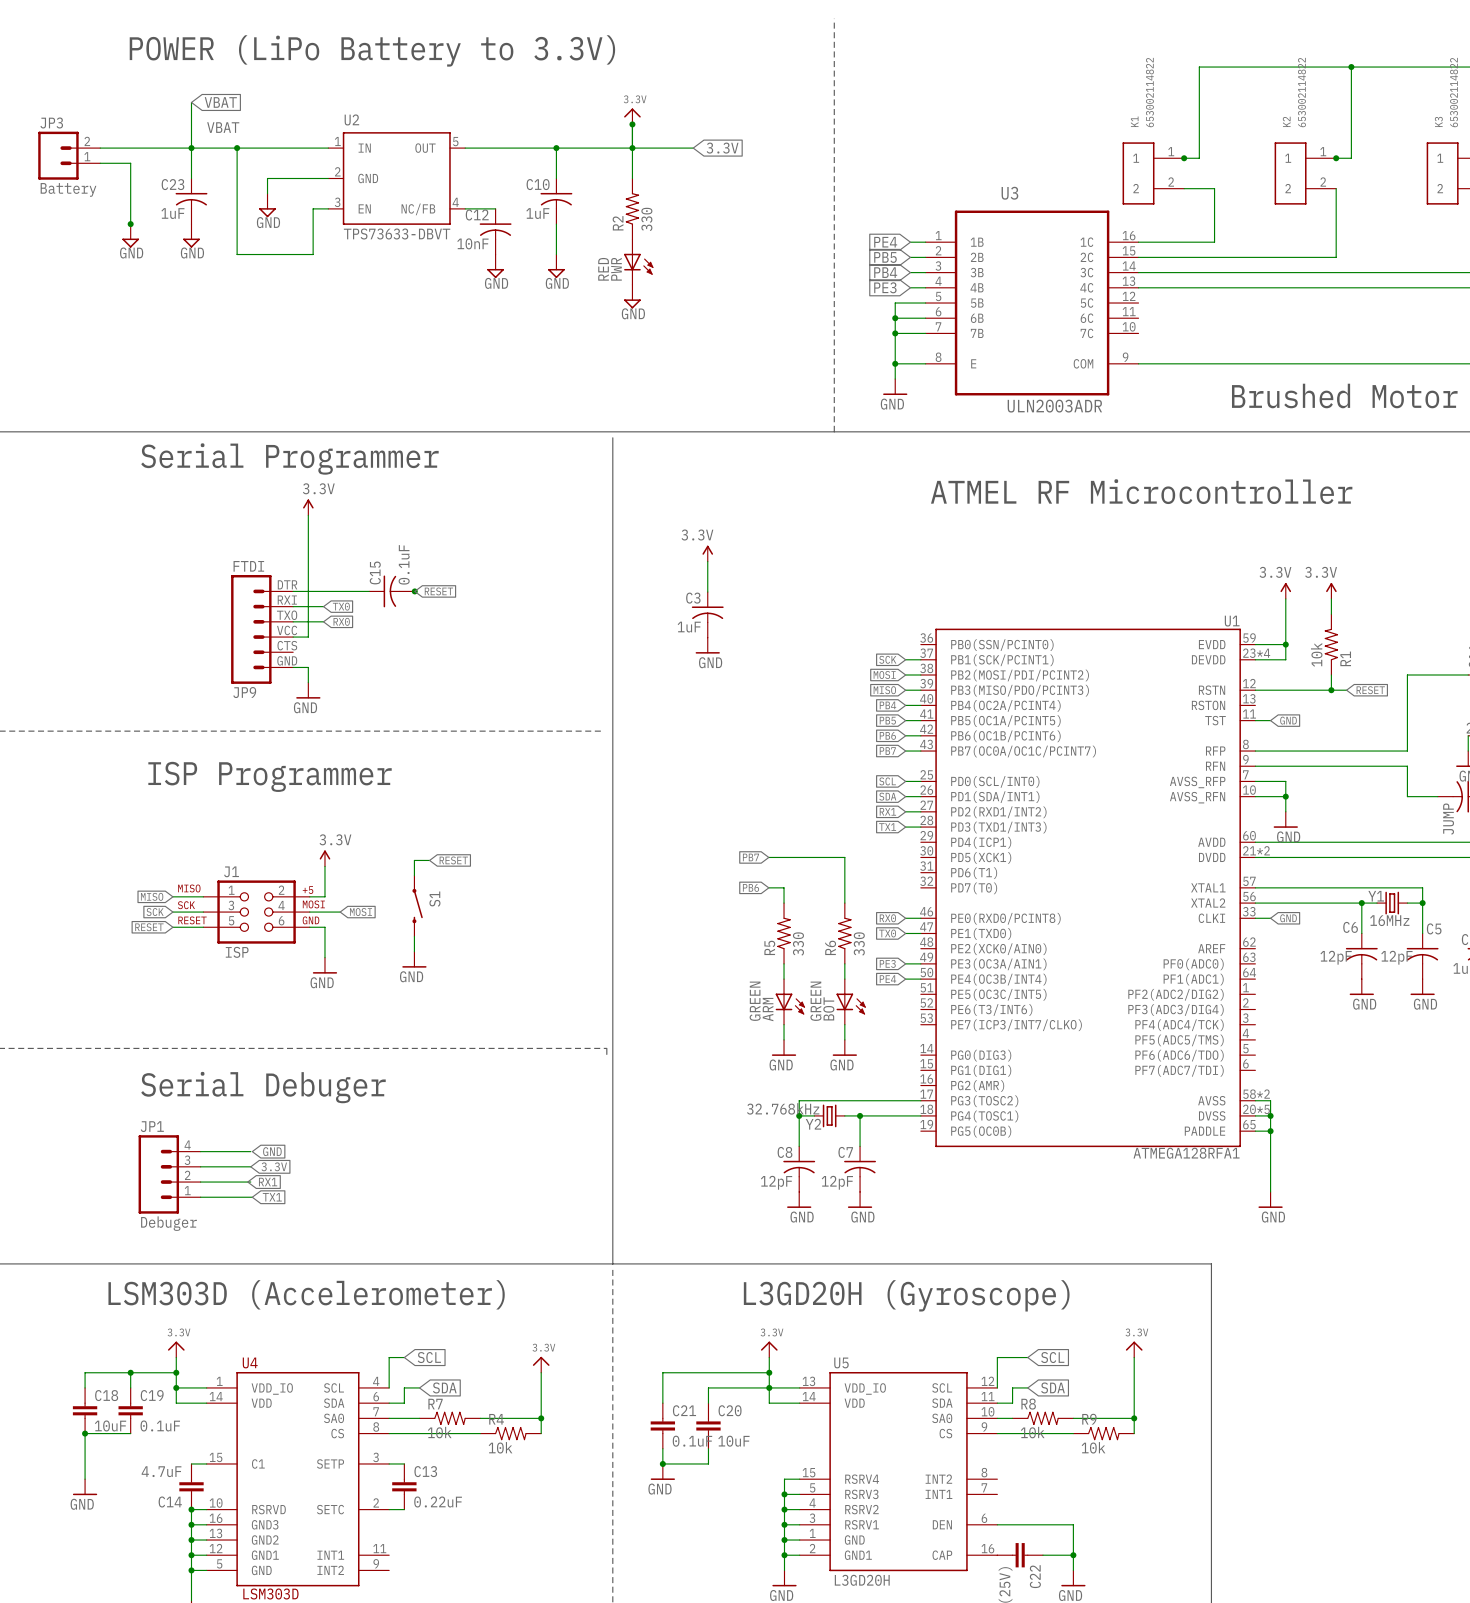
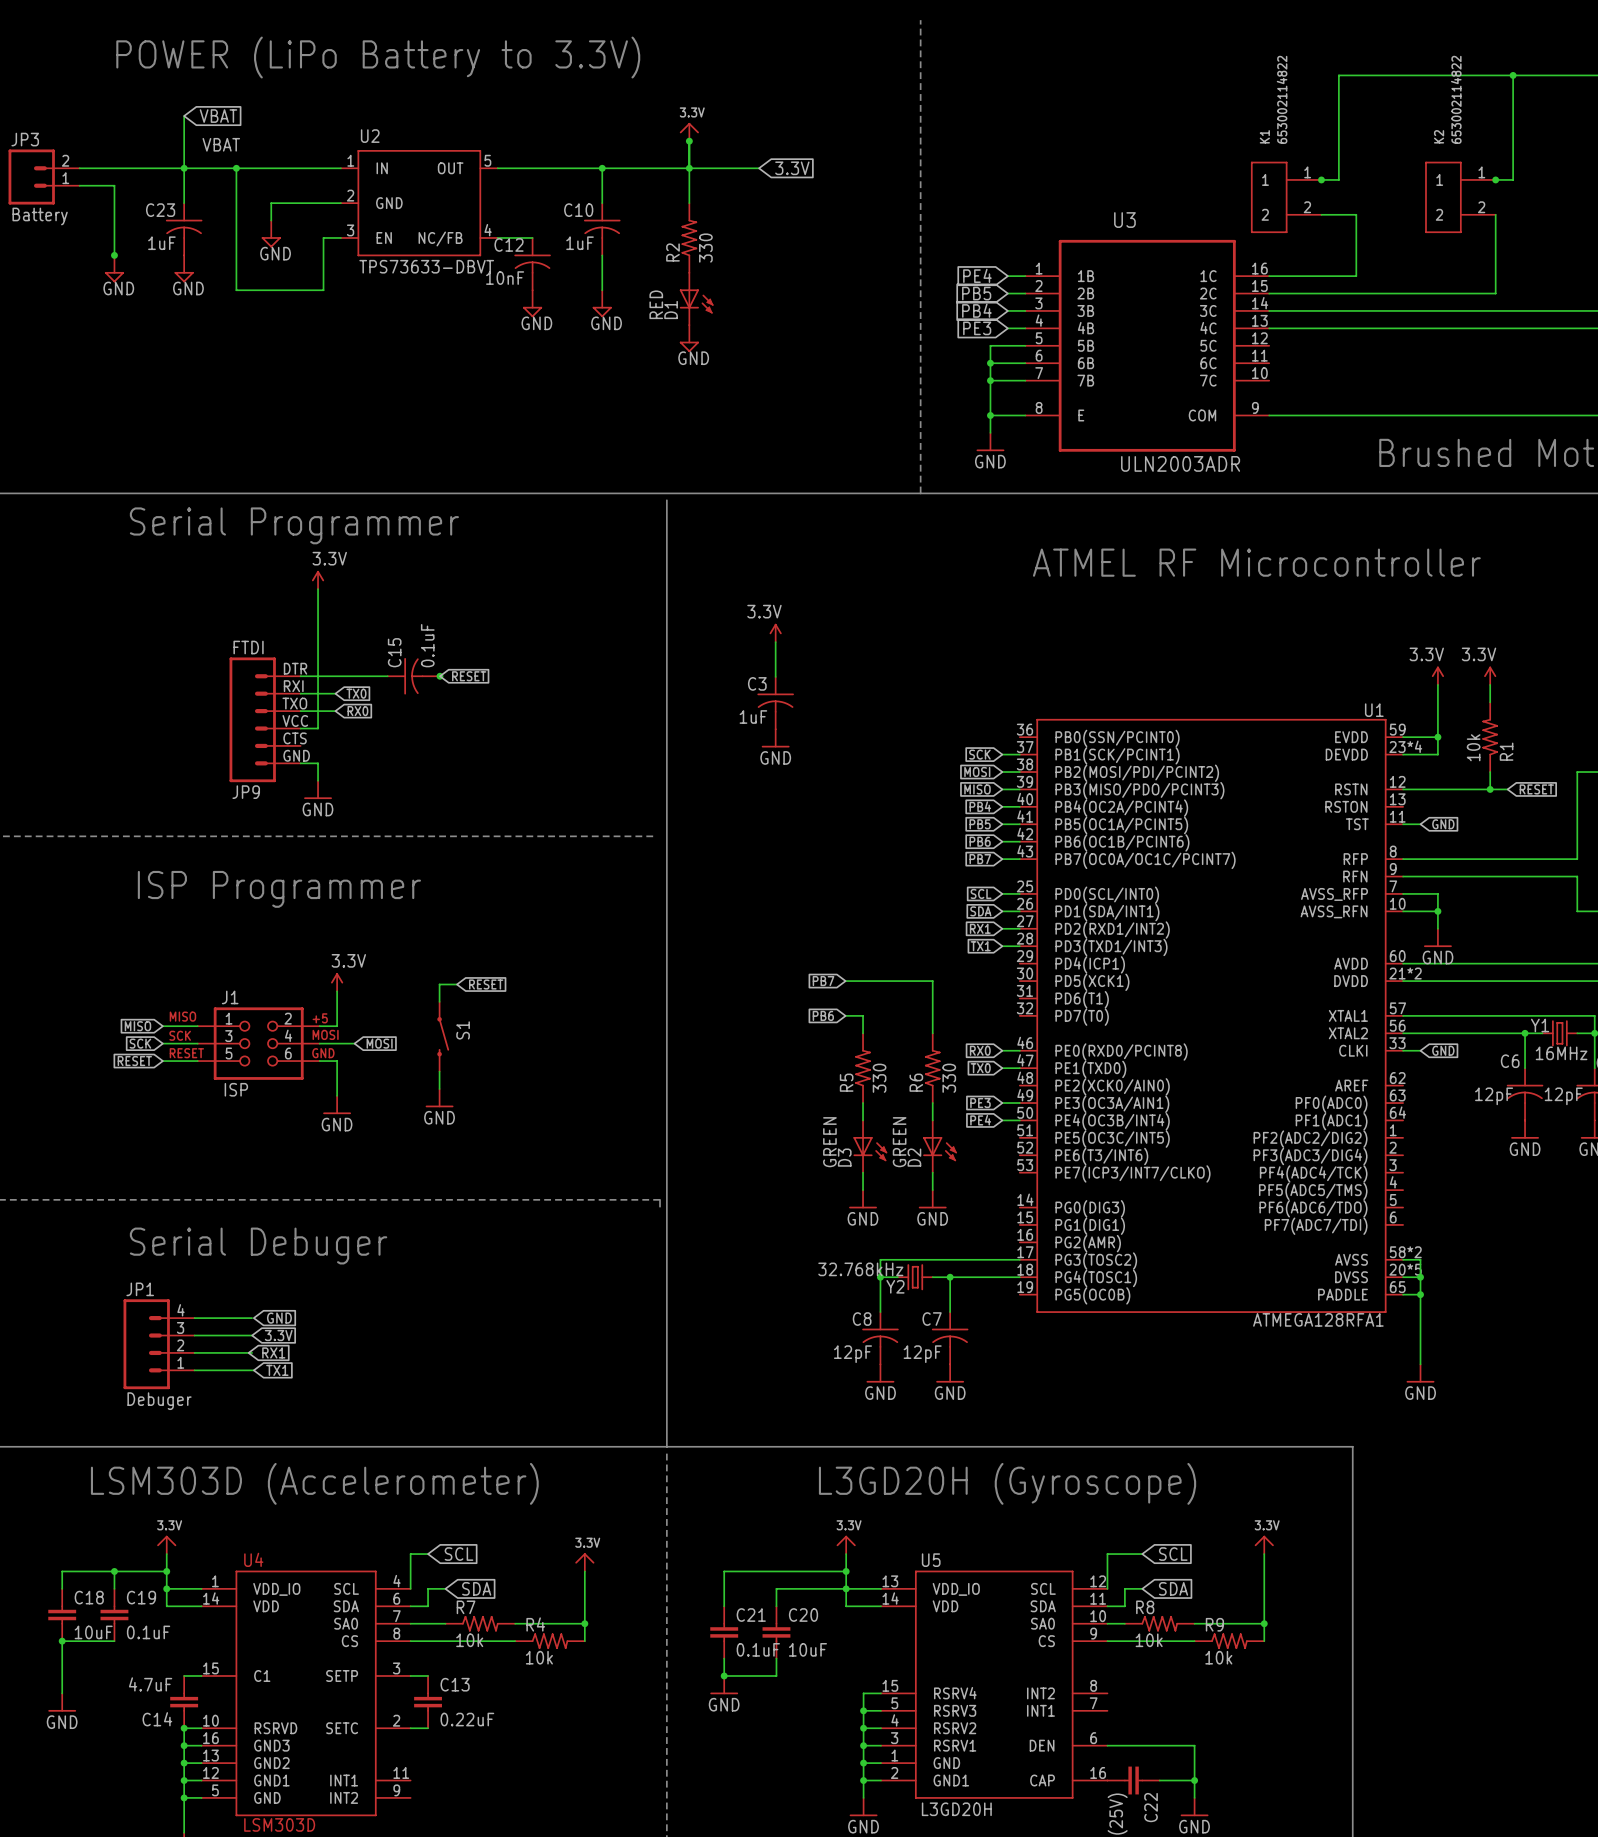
PWR name: PWR (616, 269) -> D1 (671, 309)
BOT name: BOT (828, 1008) -> D2 (914, 1157)
ARM name: ARM (768, 1009) -> D3 (844, 1157)

